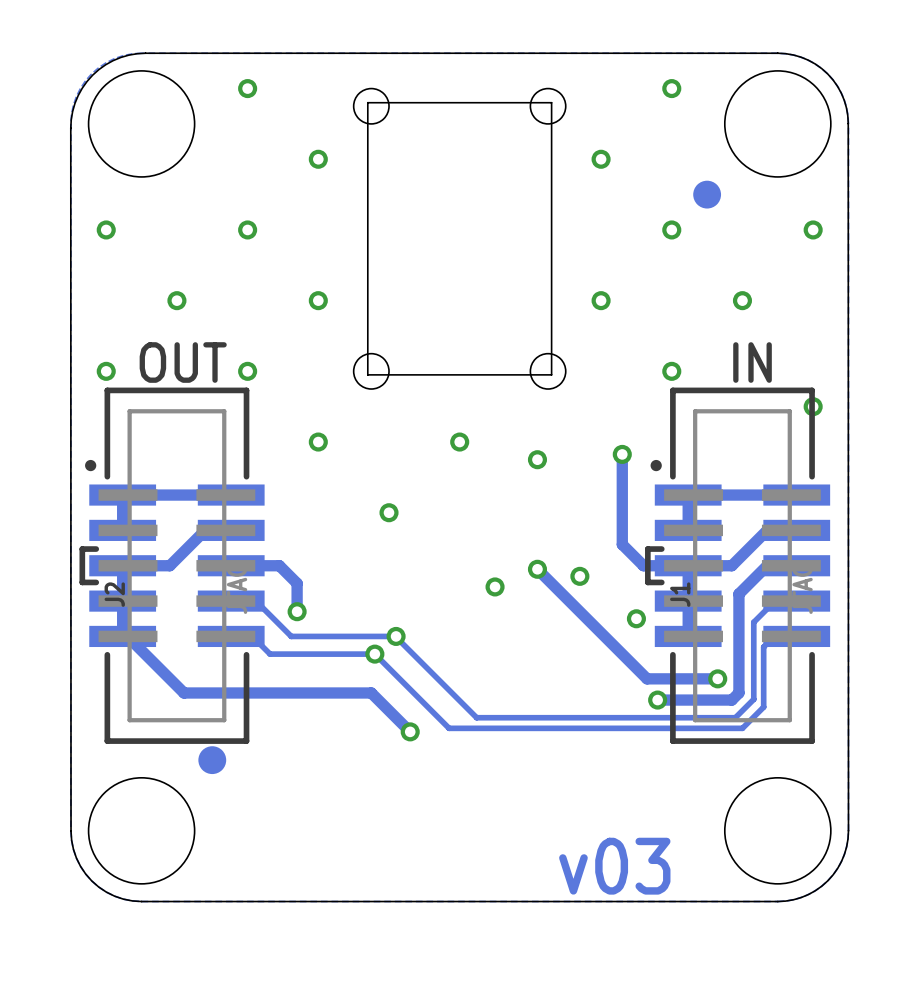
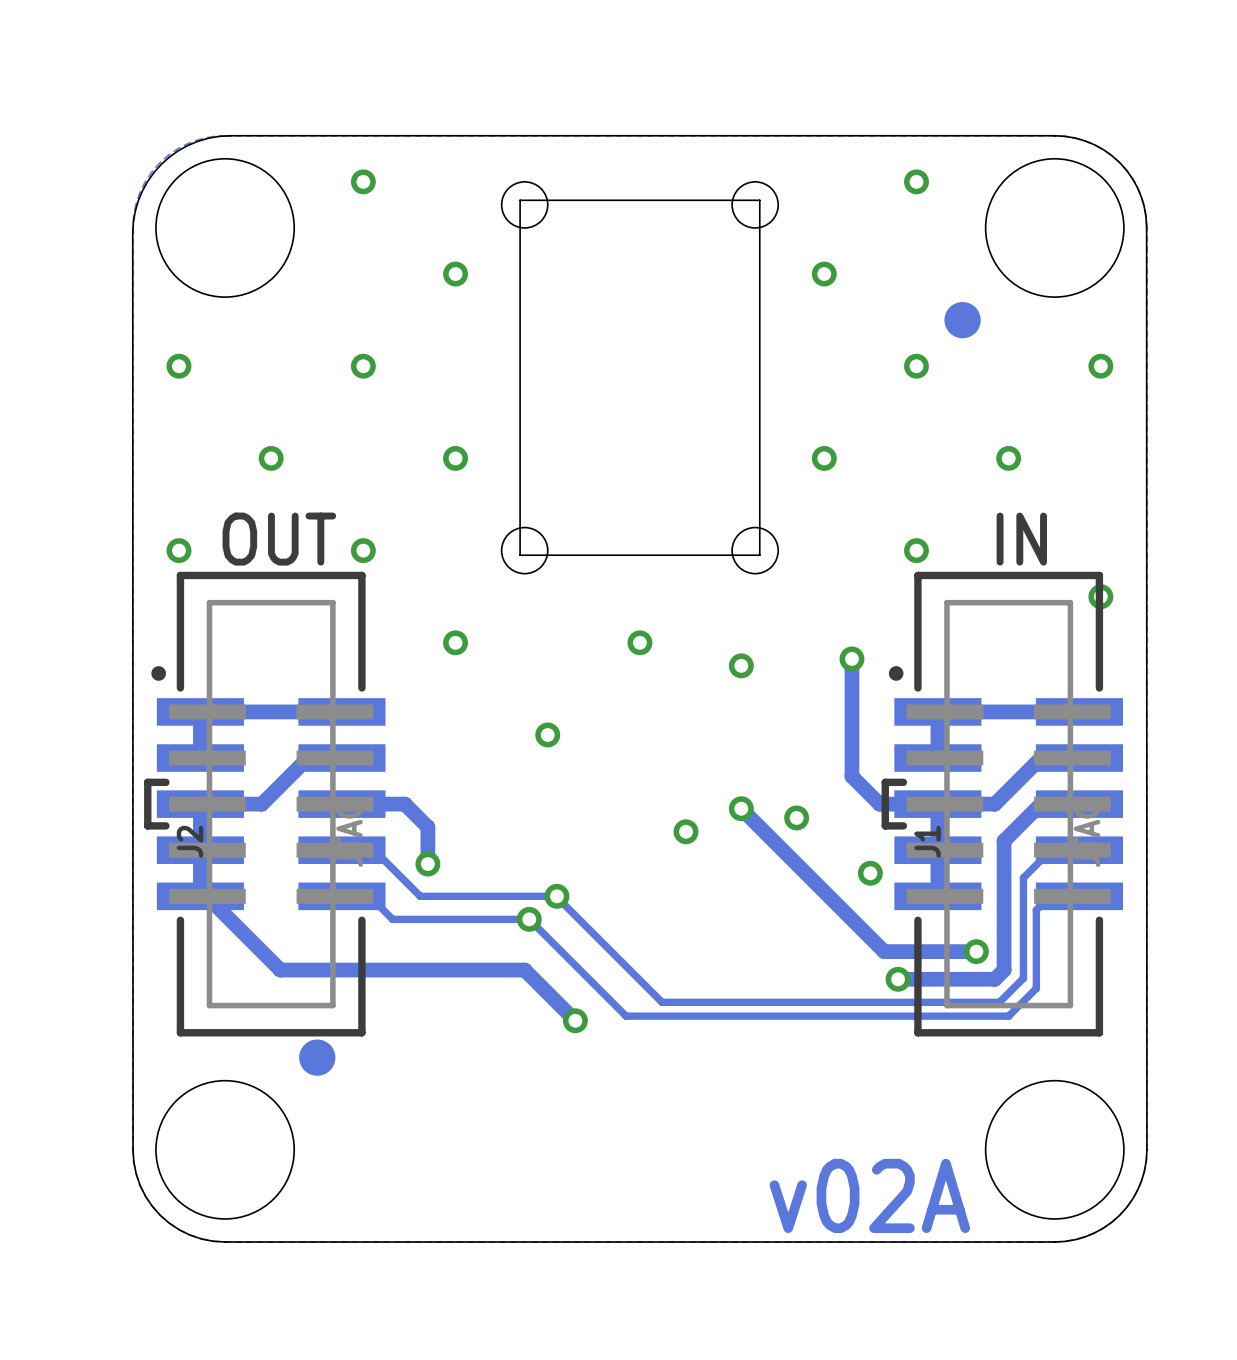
text: v03 (614, 866) -> v02A (869, 1195)

